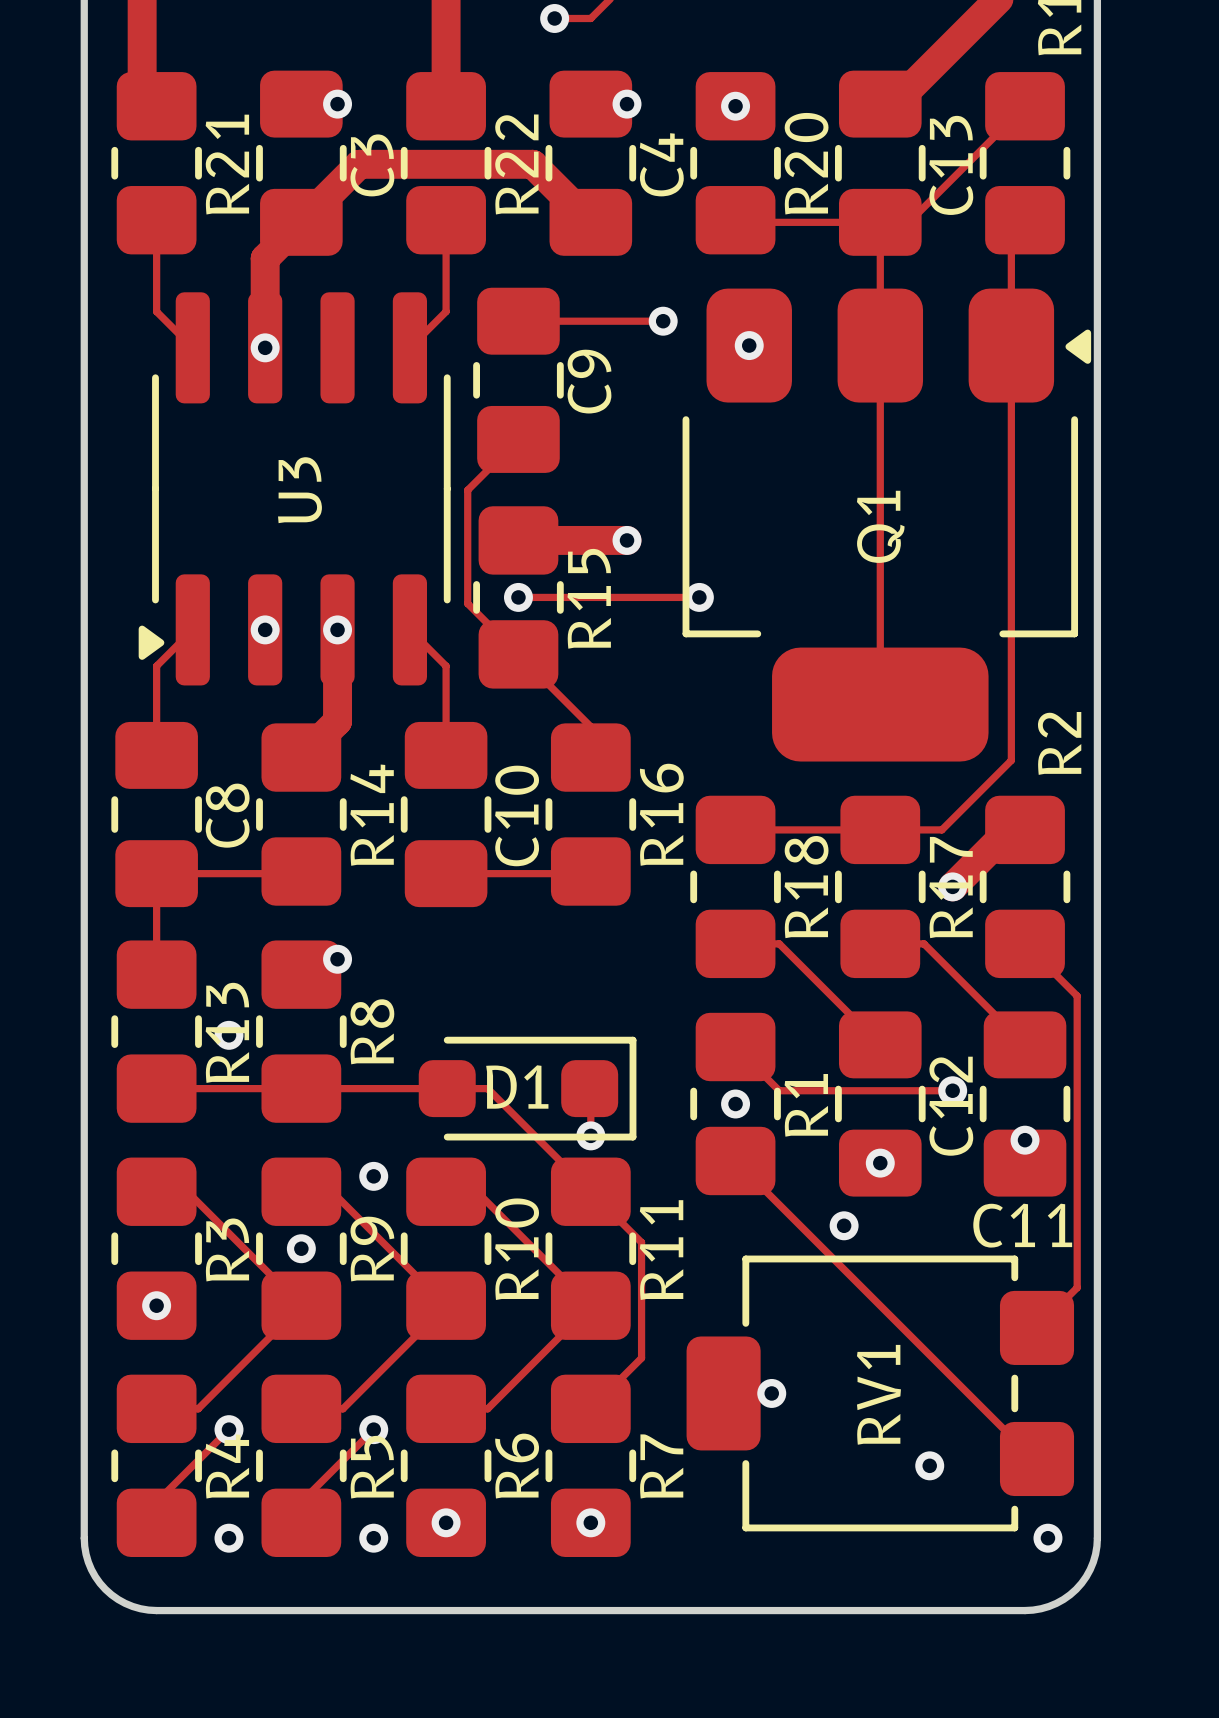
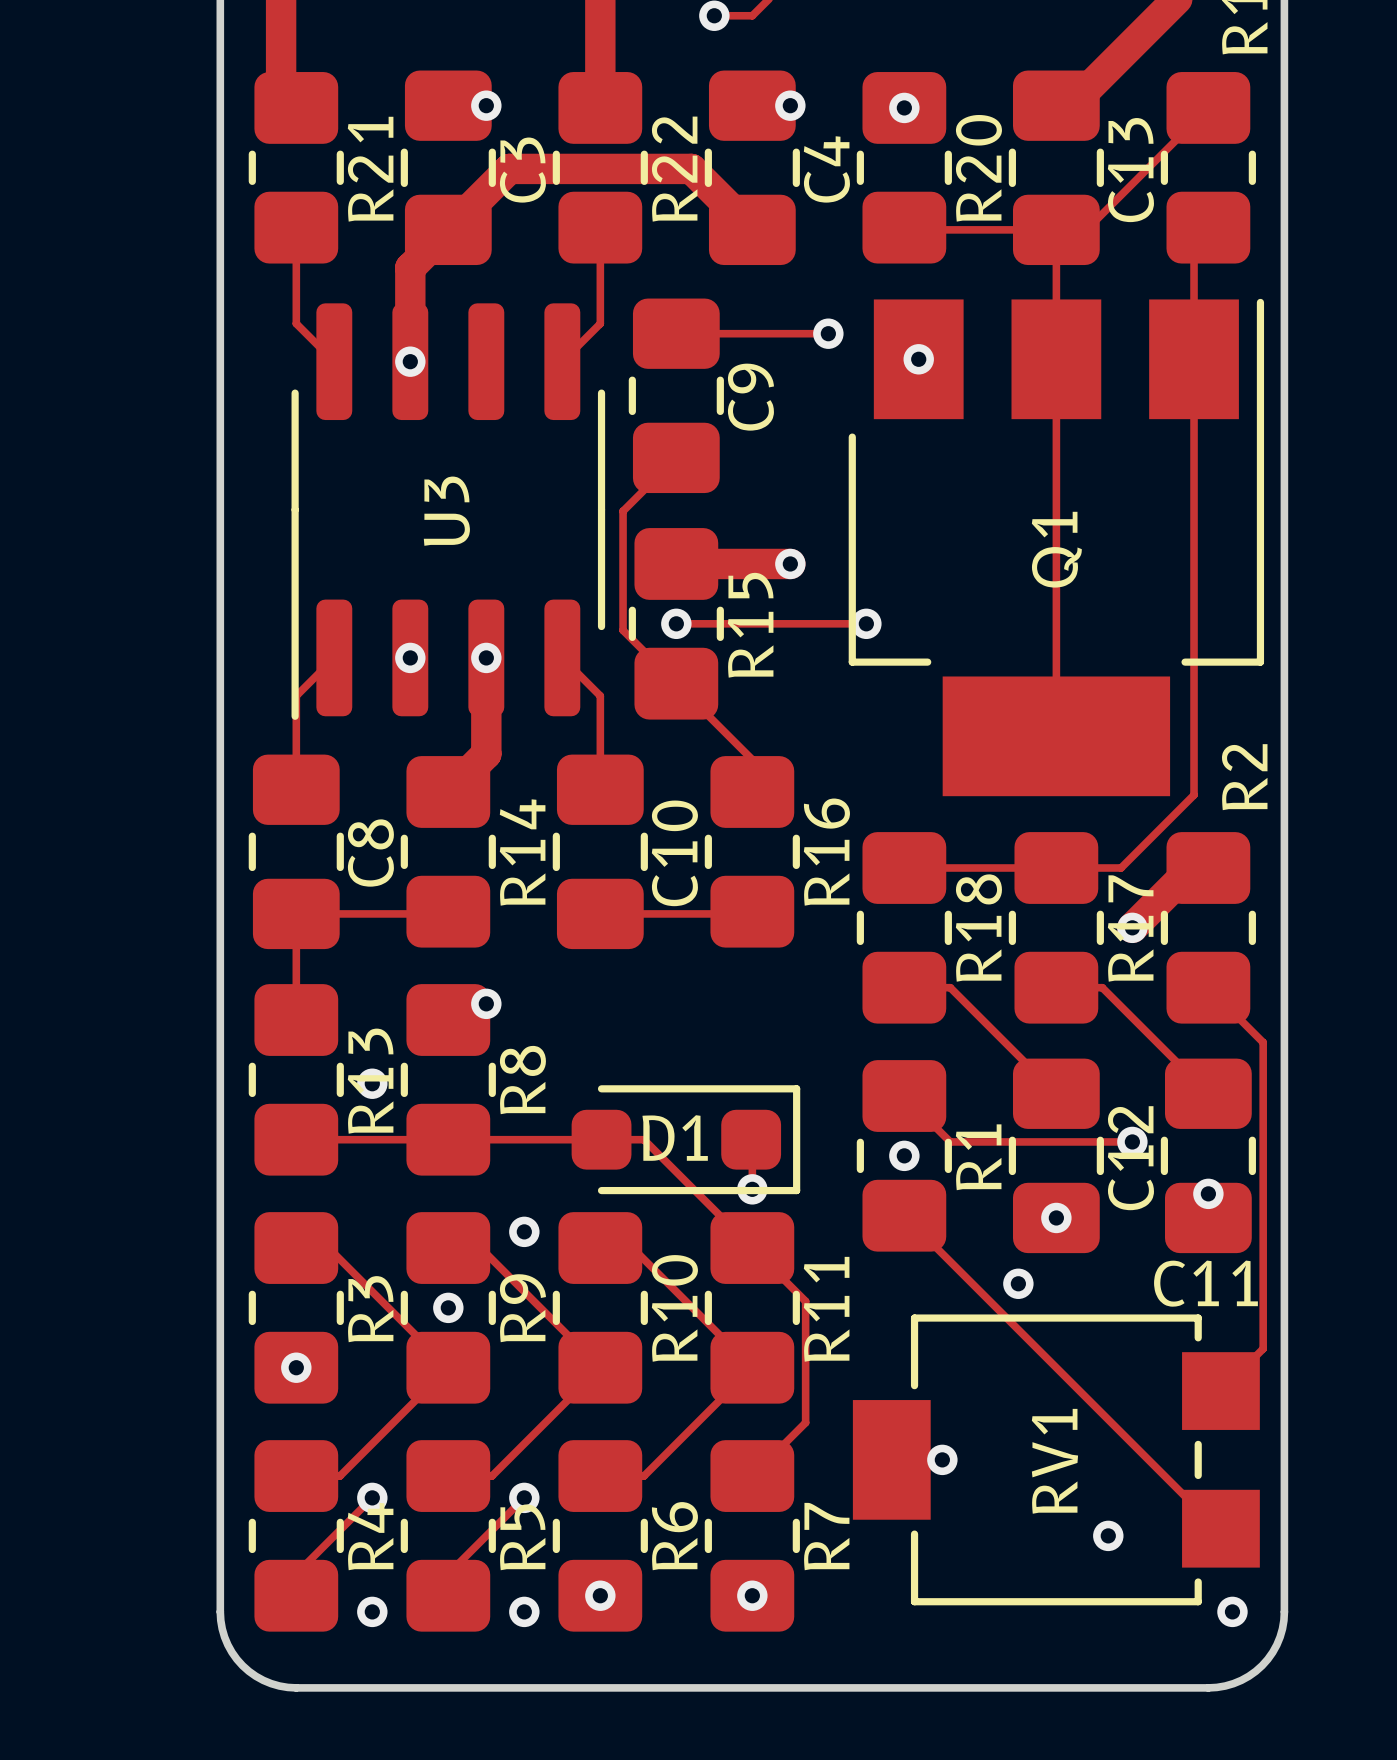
Q1 footprint: [682, 288, 1092, 762] -> [848, 298, 1265, 797]
U3 footprint: [138, 292, 451, 686] -> [291, 303, 606, 720]
RV1 footprint: [686, 1255, 1075, 1532] -> [852, 1314, 1260, 1606]

